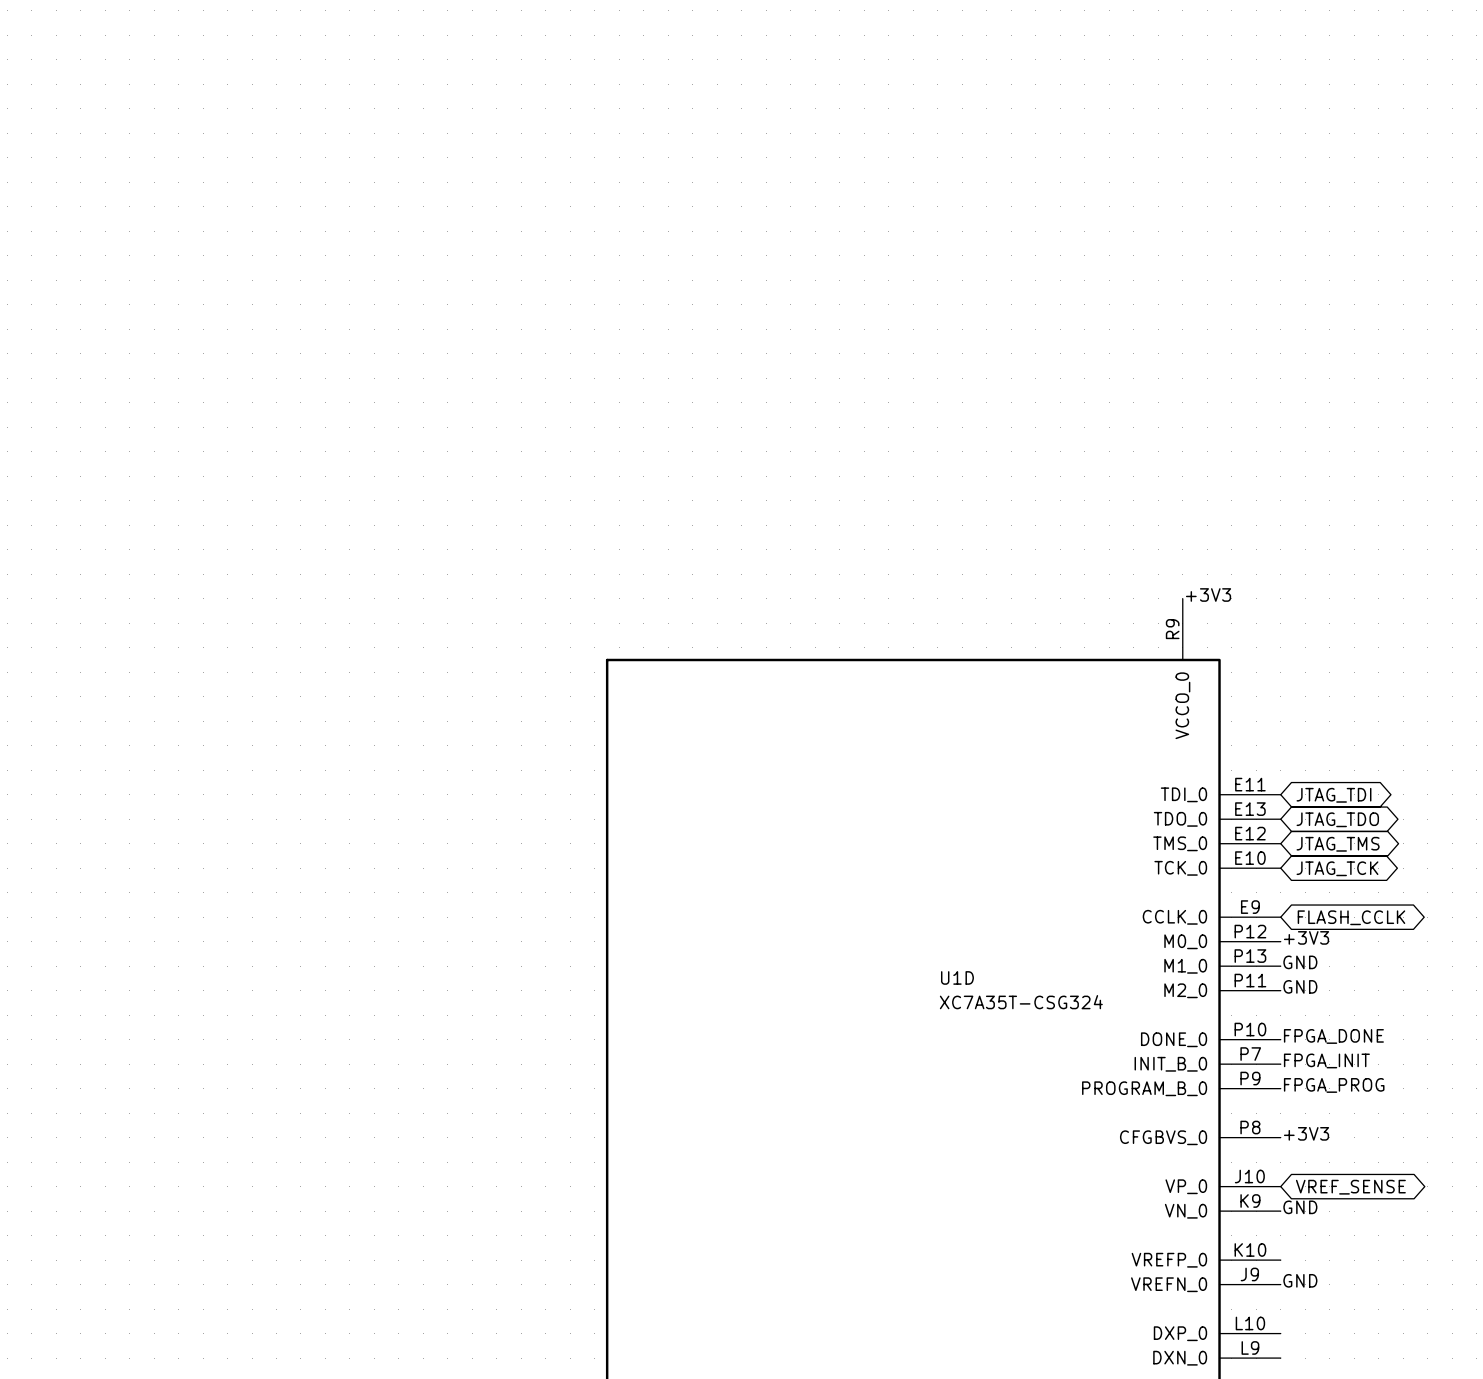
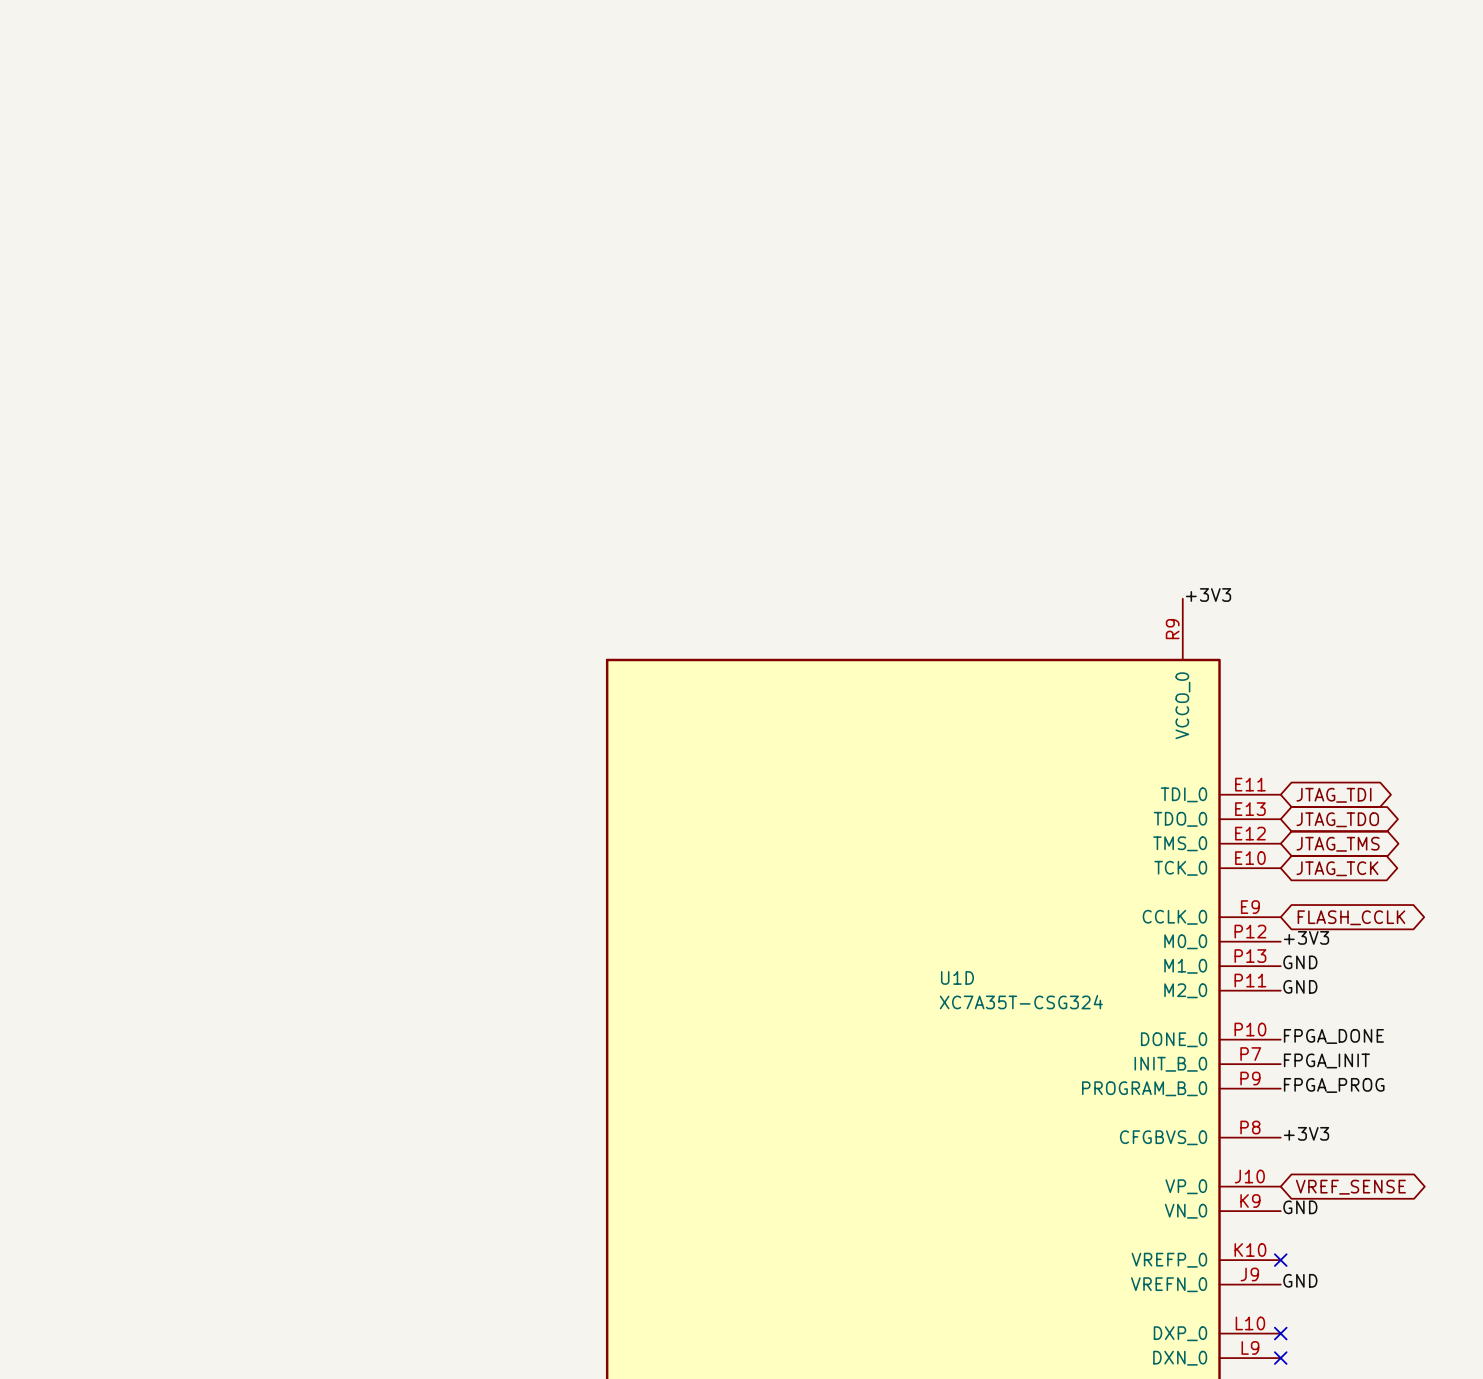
no-connect mark: none -> (1280, 1260)
no-connect mark: none -> (1280, 1333)
no-connect mark: none -> (1280, 1358)

